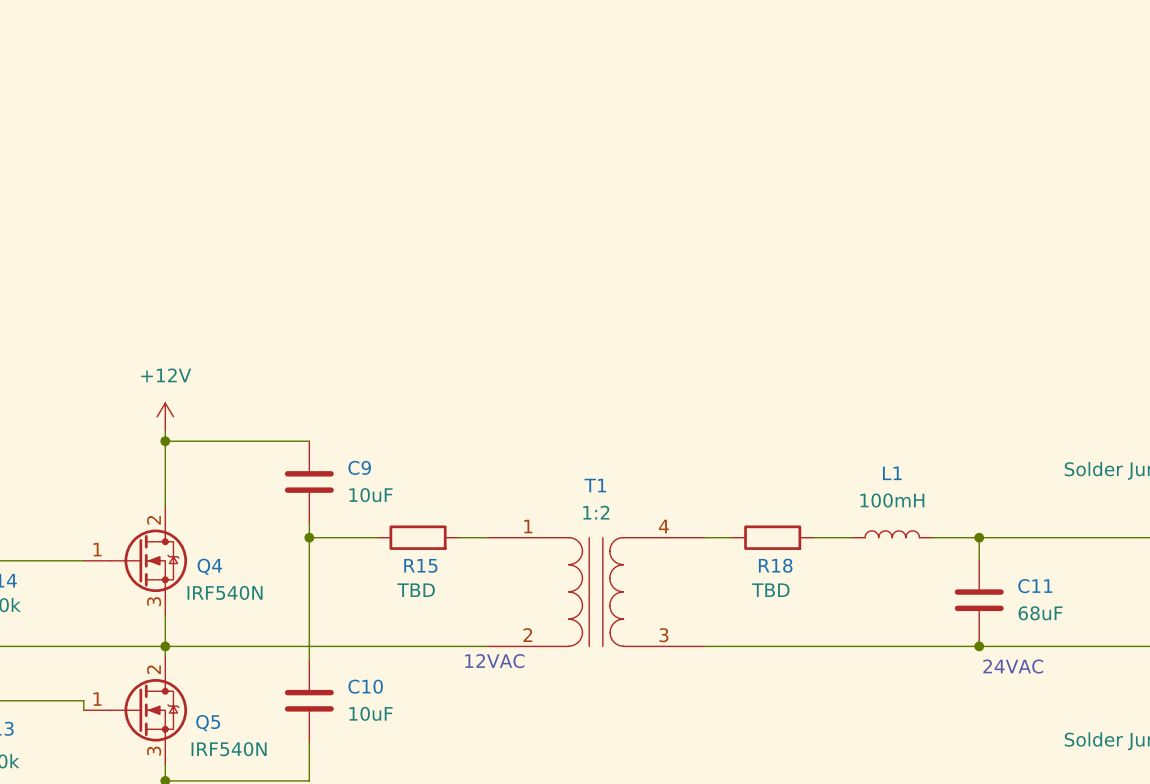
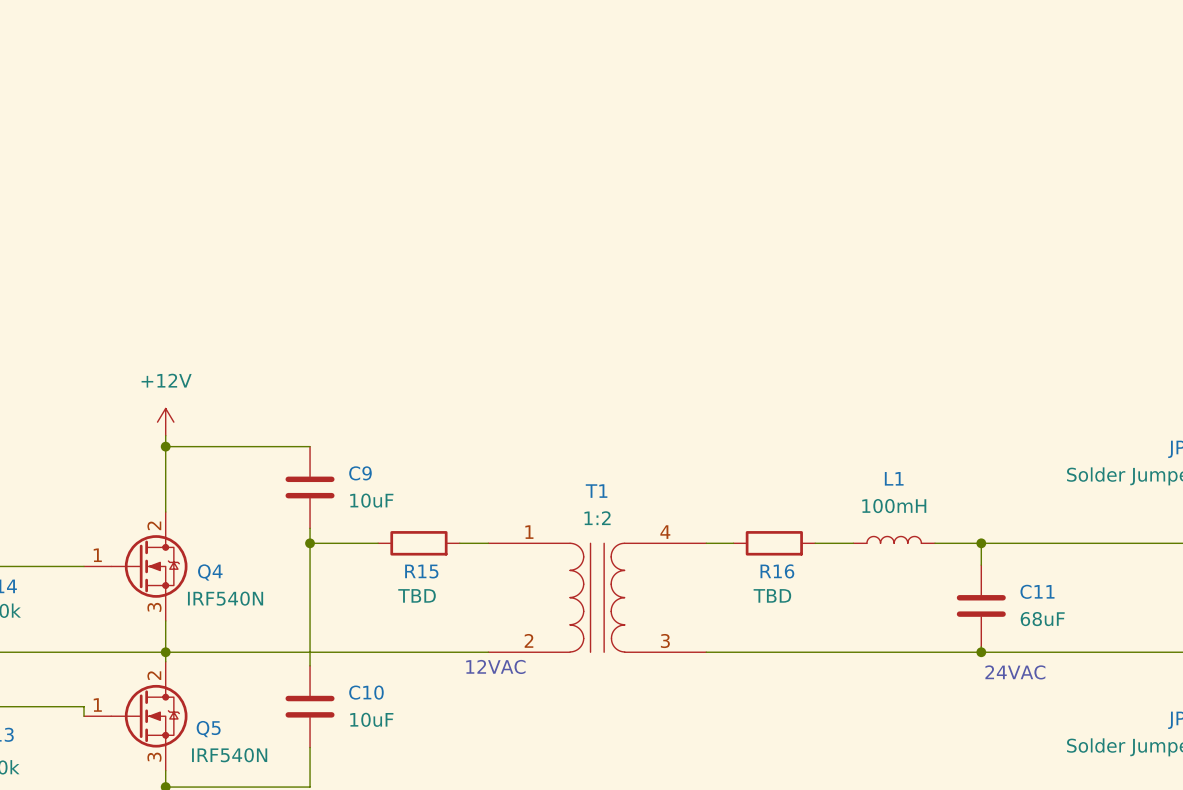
R18 name: R18 (775, 565) -> R16 (777, 571)

